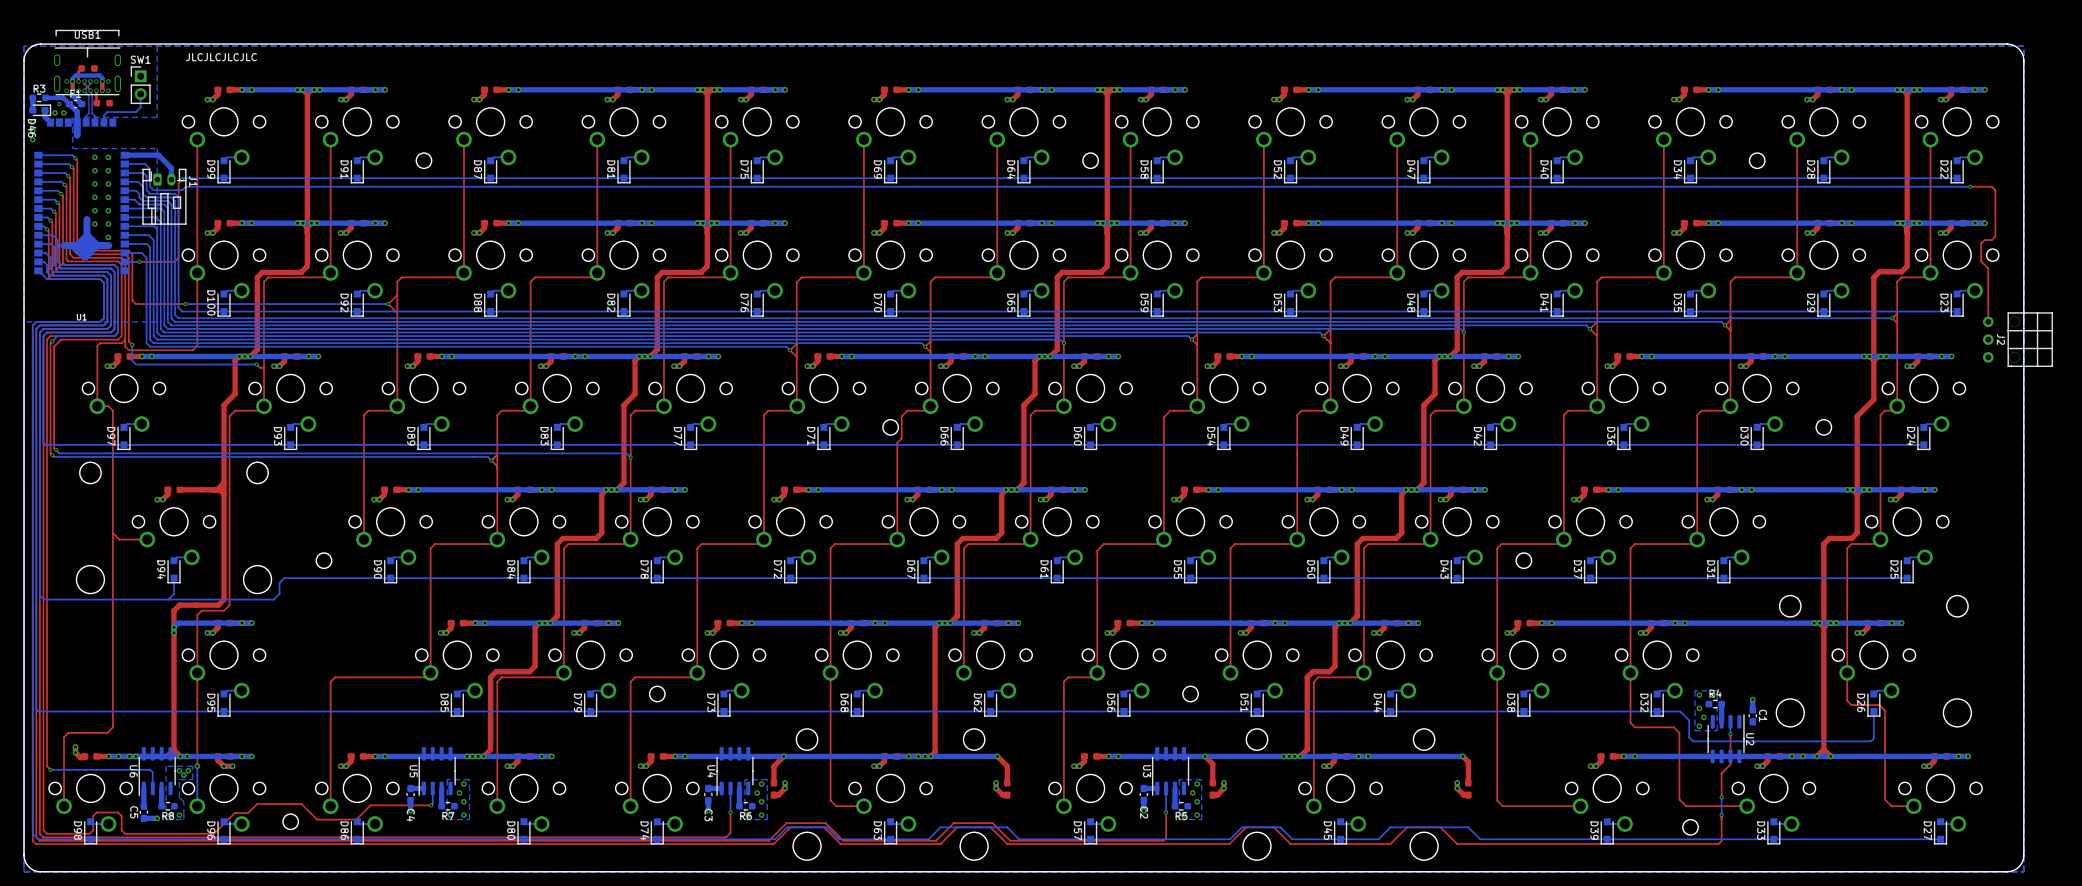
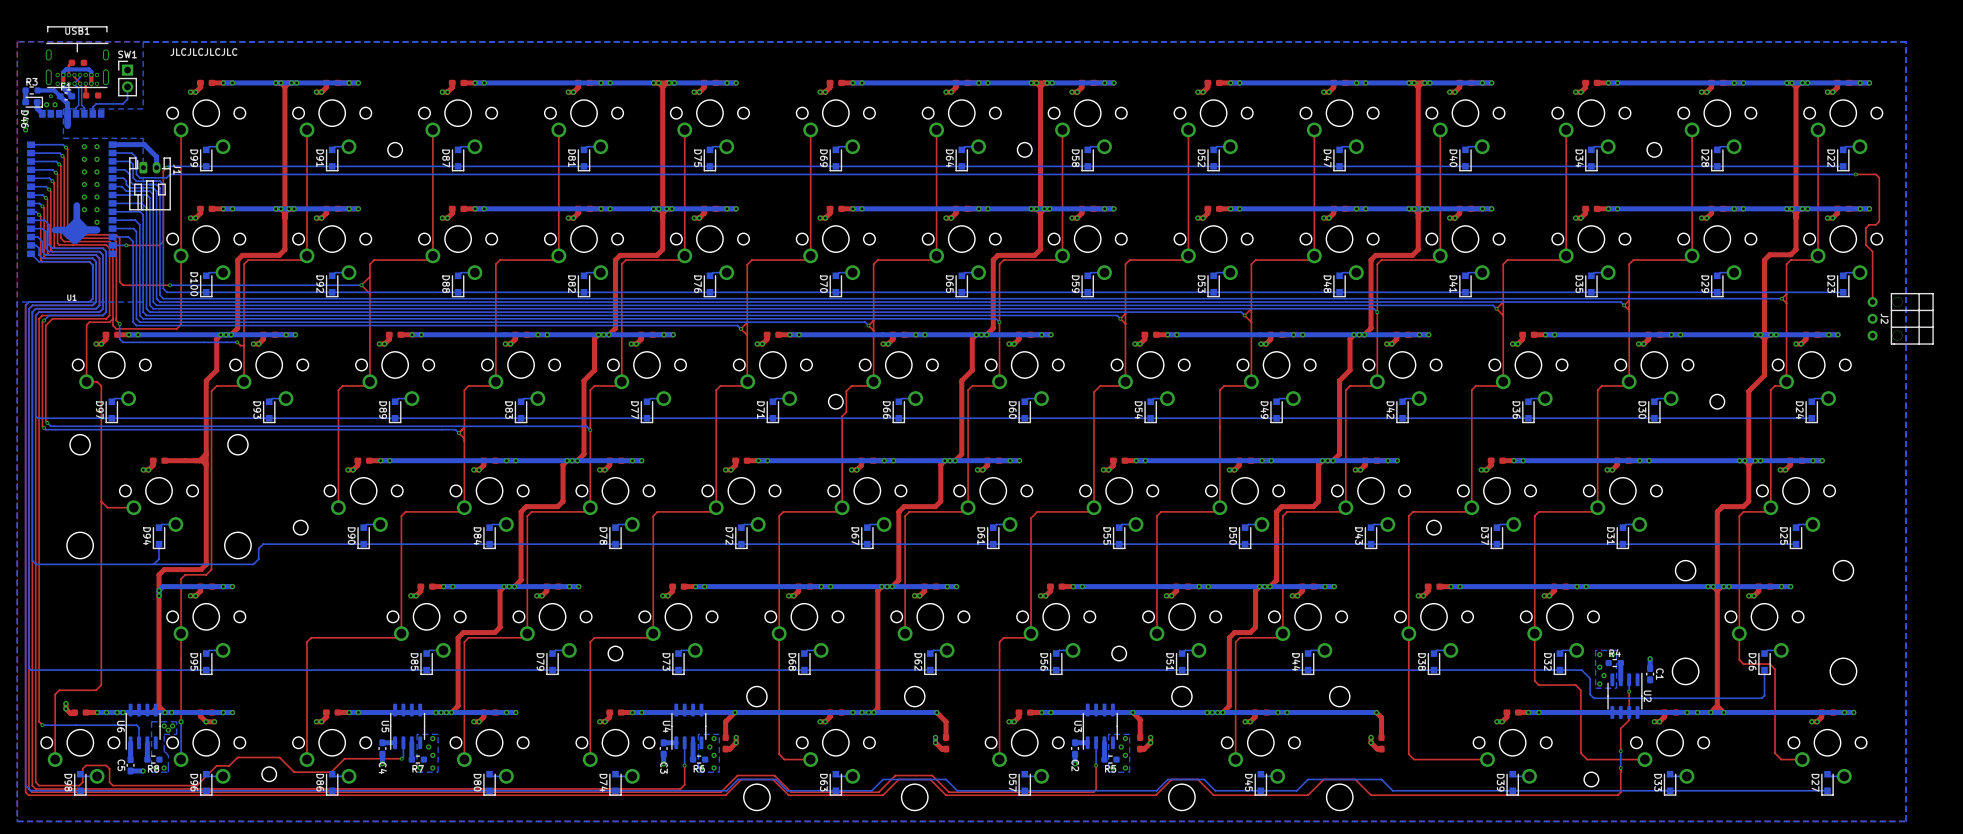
board edge: (2007, 44) (34, 45) (26, 52) (24, 60) (25, 861) (32, 869) (40, 871) (2013, 870) (2021, 863) (2023, 855) (2023, 60) (2018, 48) (2007, 44) -> none

